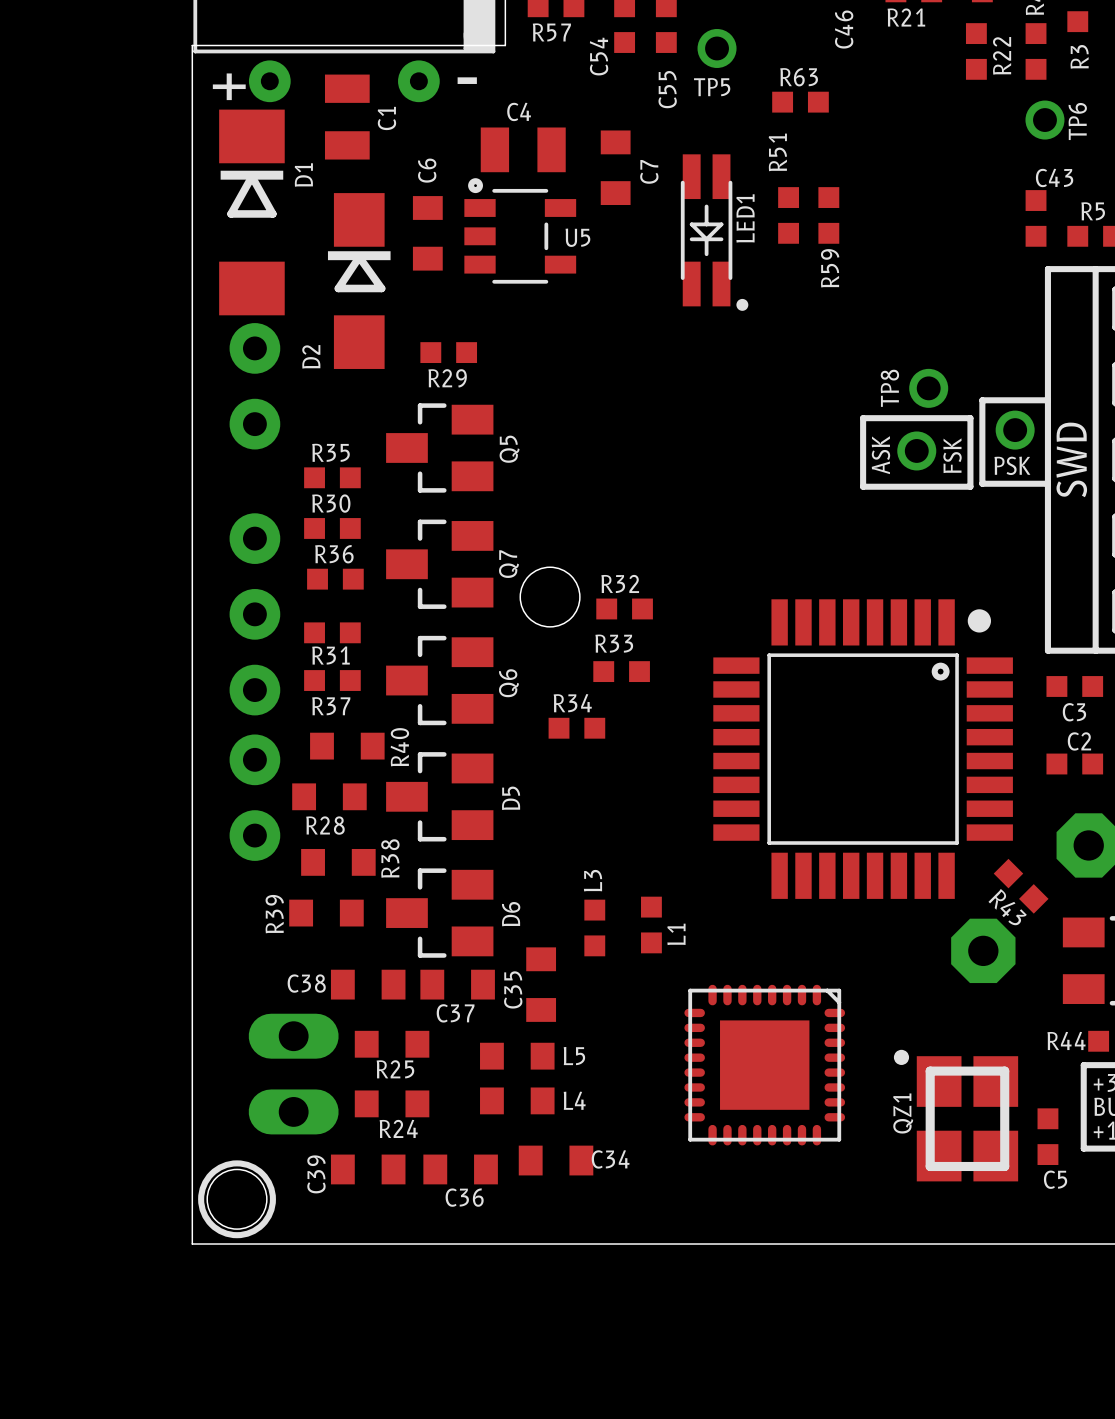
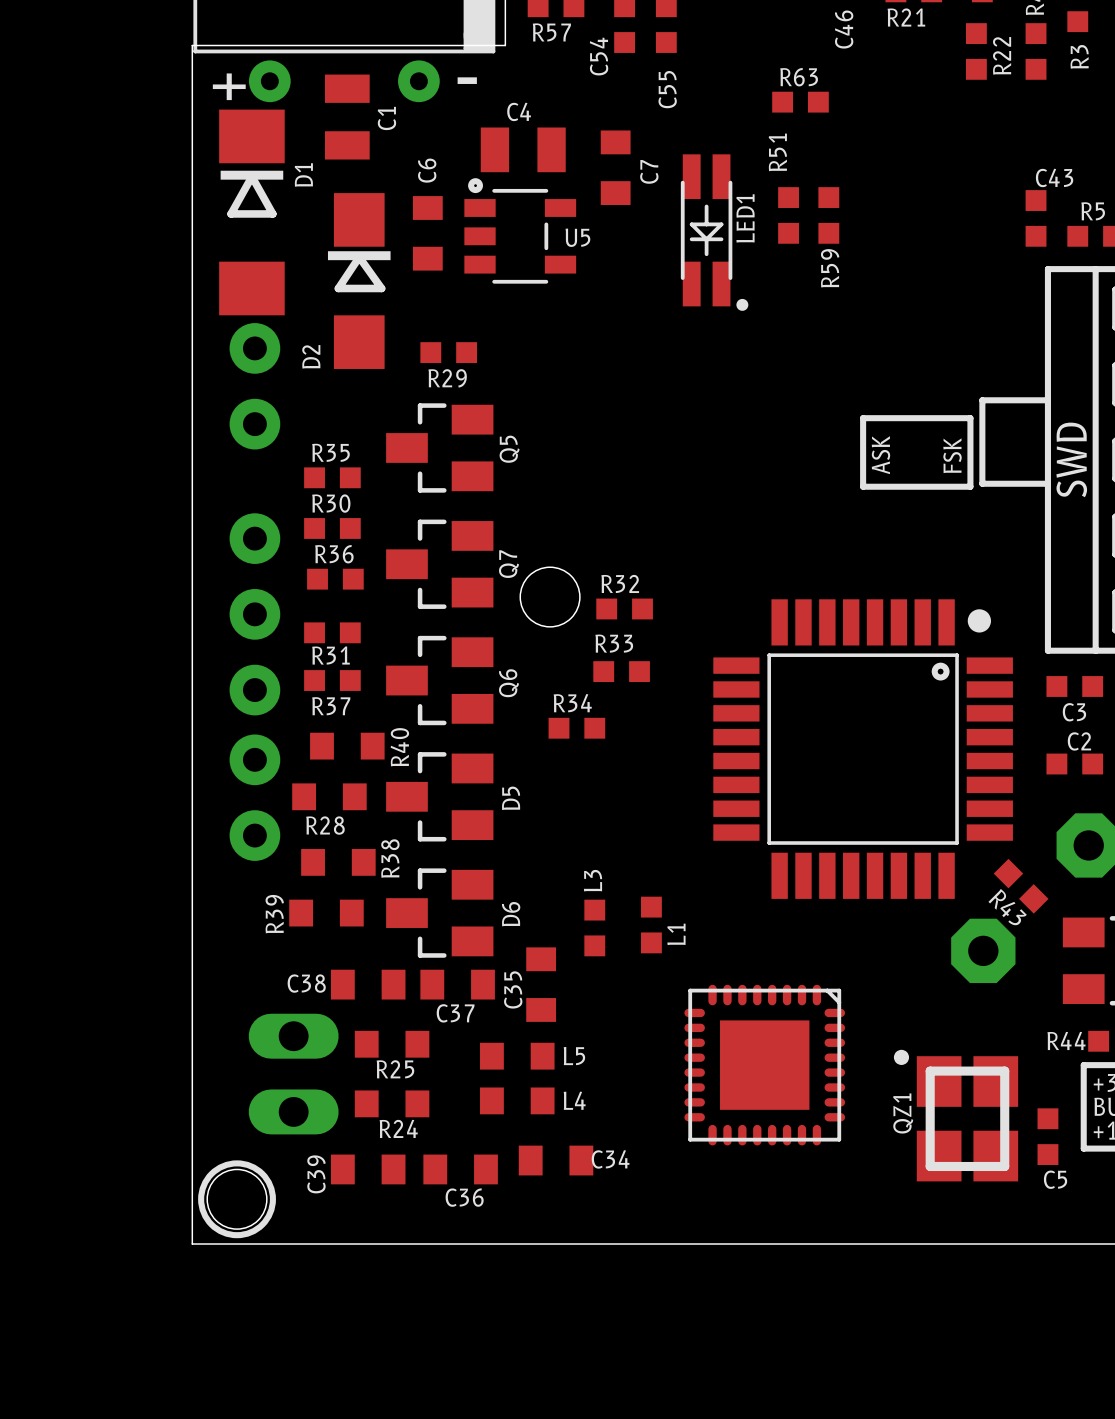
TP5: (717, 48) -> none
TP6: (1044, 120) -> none
TP8: (928, 388) -> none
PSK: (1015, 430) -> none
part: (916, 450) -> none

